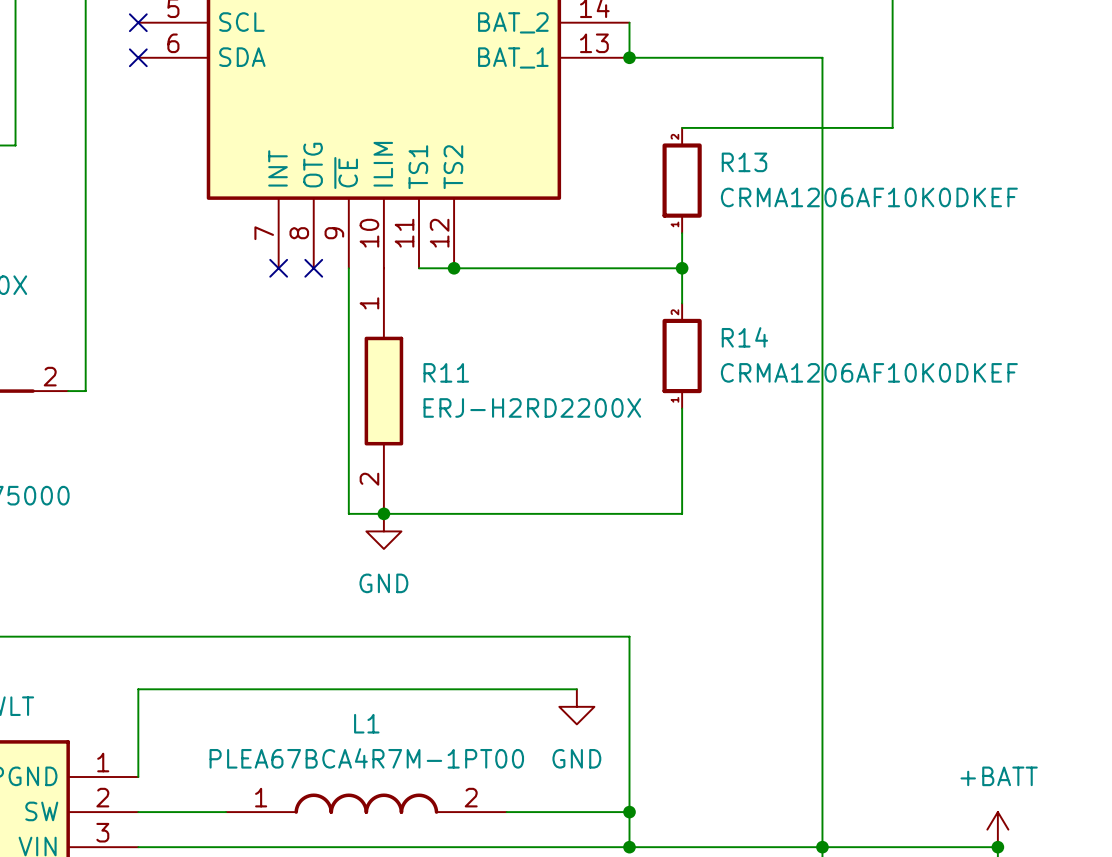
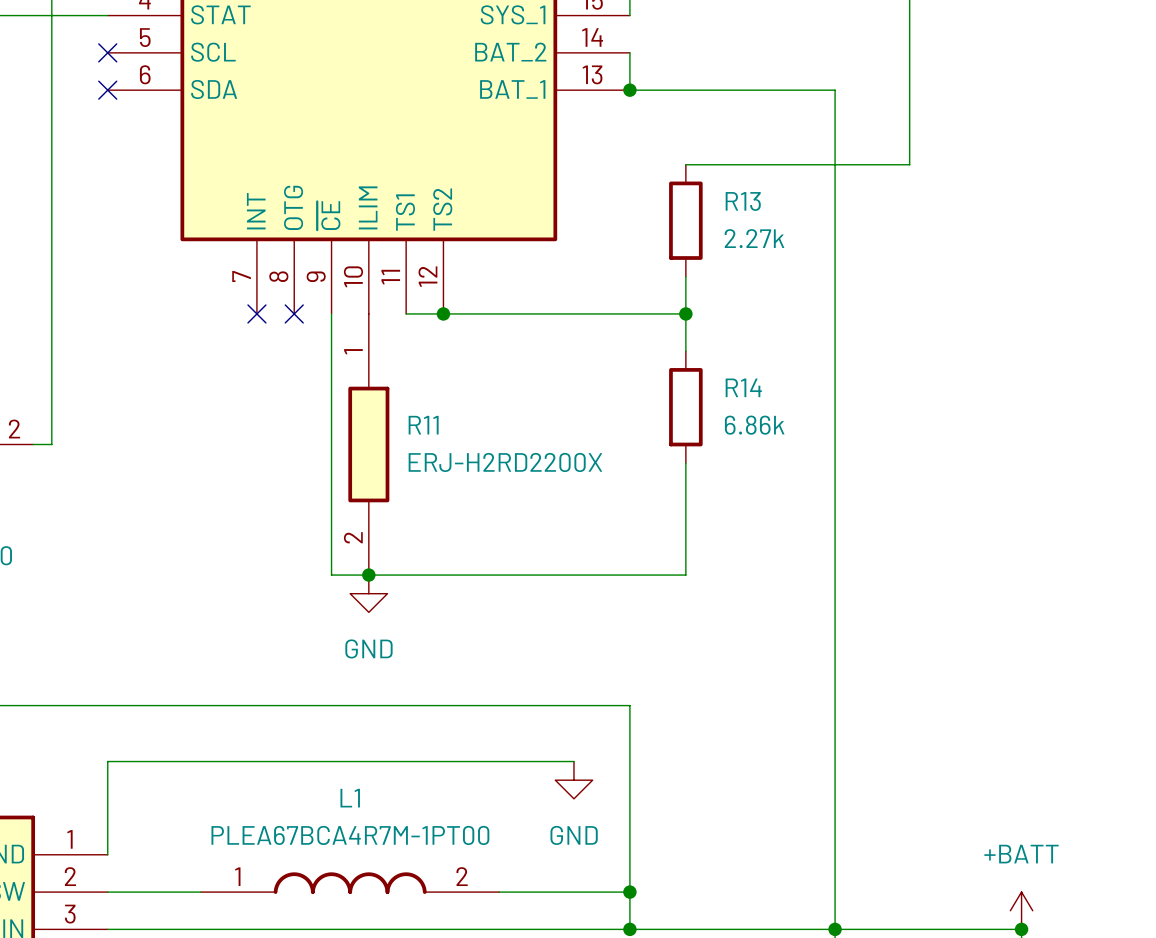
R13 symbol: [662, 127, 702, 234] -> [669, 164, 703, 277]
R13 value: CRMA1206AF10K0DKEF (869, 197) -> 2.27k (754, 238)
R14 symbol: [662, 303, 702, 409] -> [669, 351, 703, 464]
R14 value: CRMA1206AF10K0DKEF (869, 372) -> 6.86k (754, 425)

